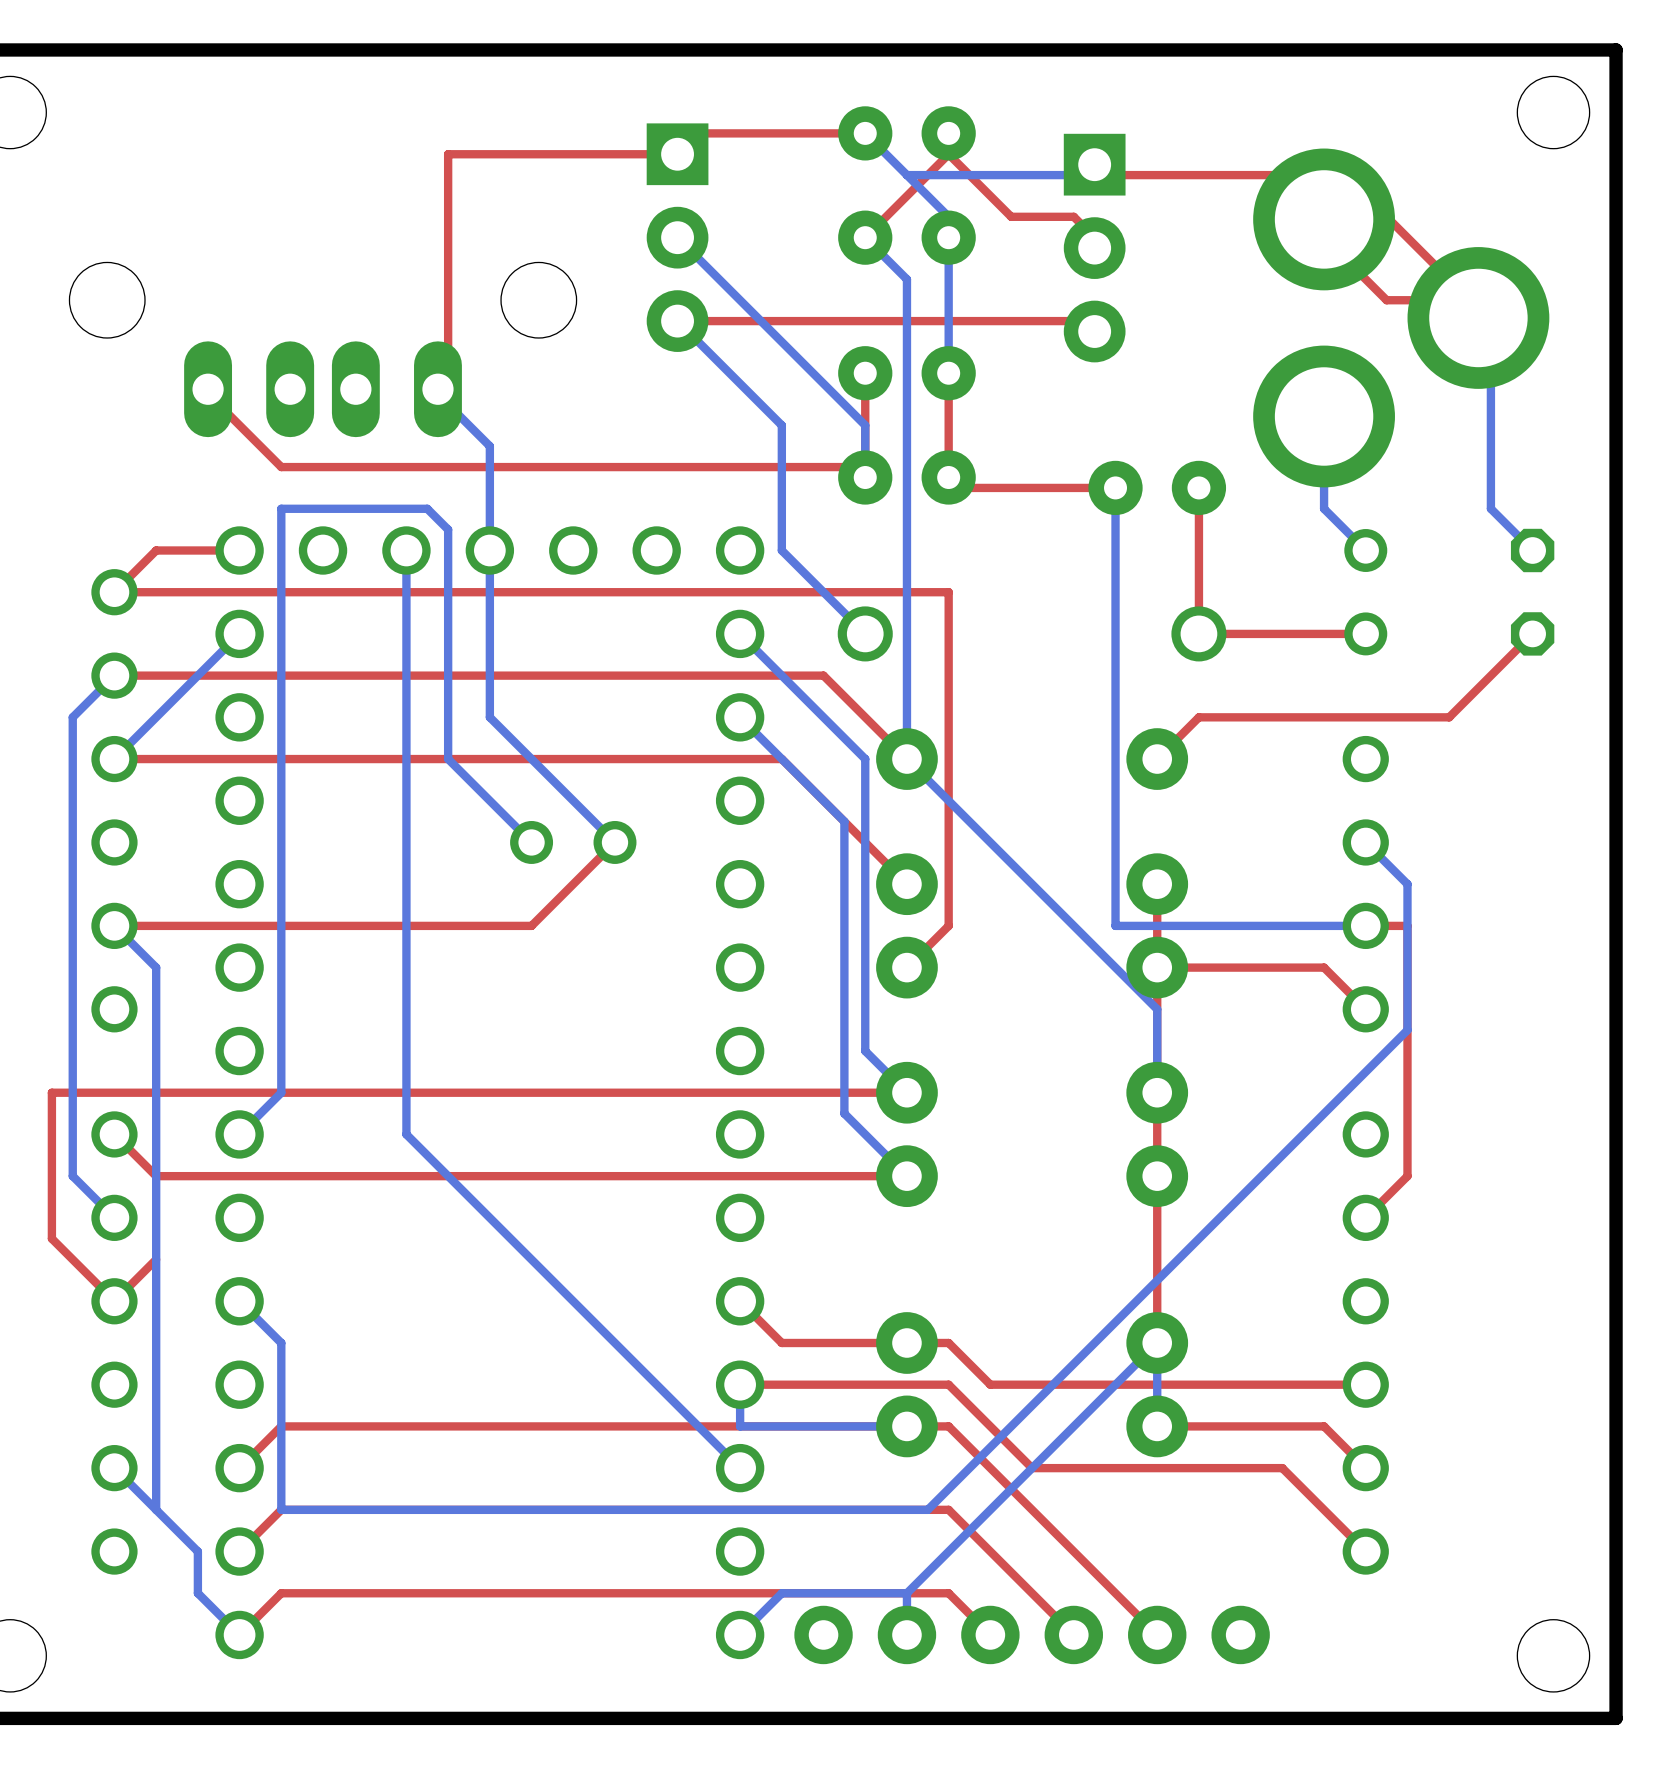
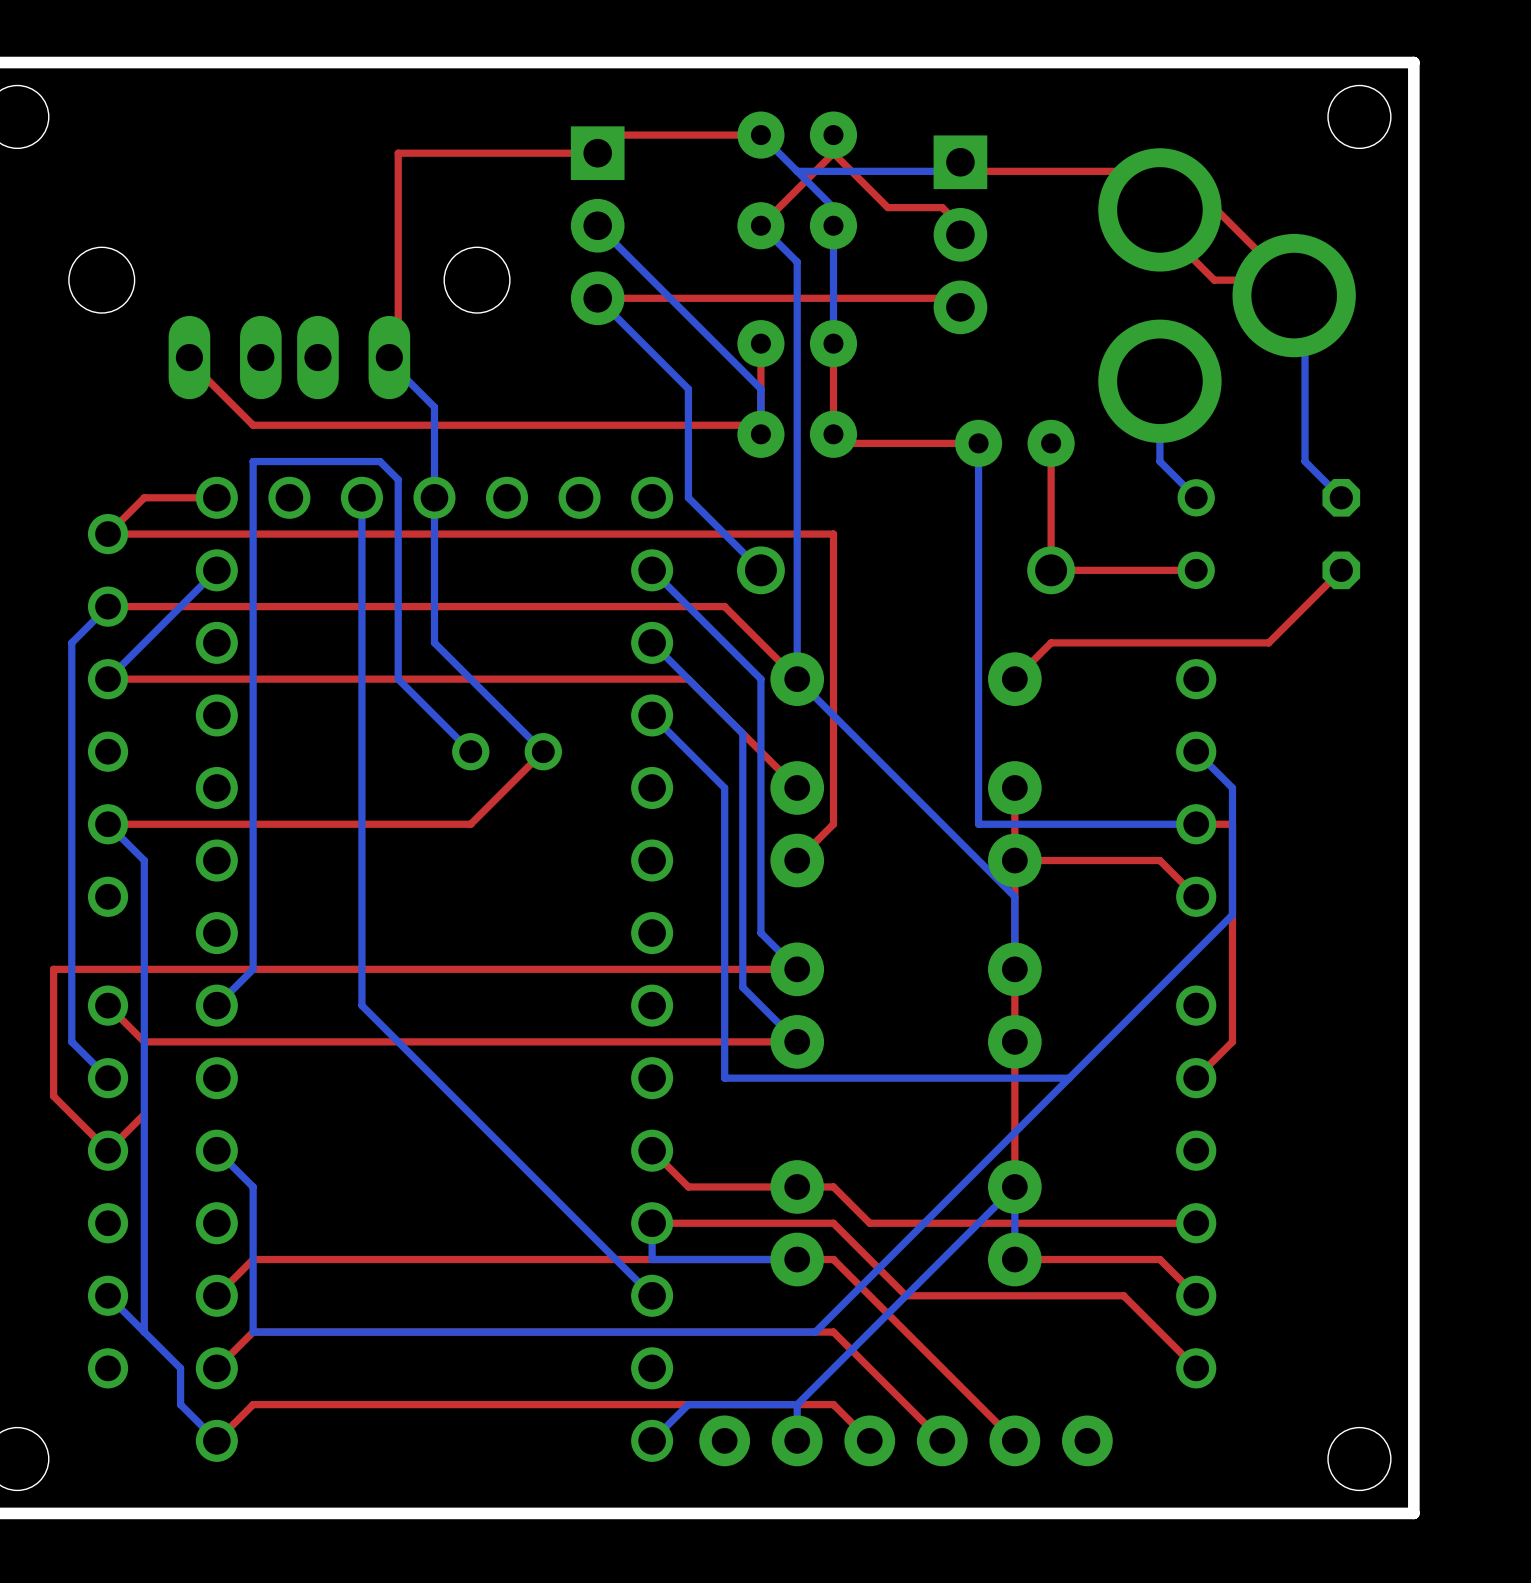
bottom track: none -> (652, 715) (724, 787) (724, 1078) (1069, 1078)

